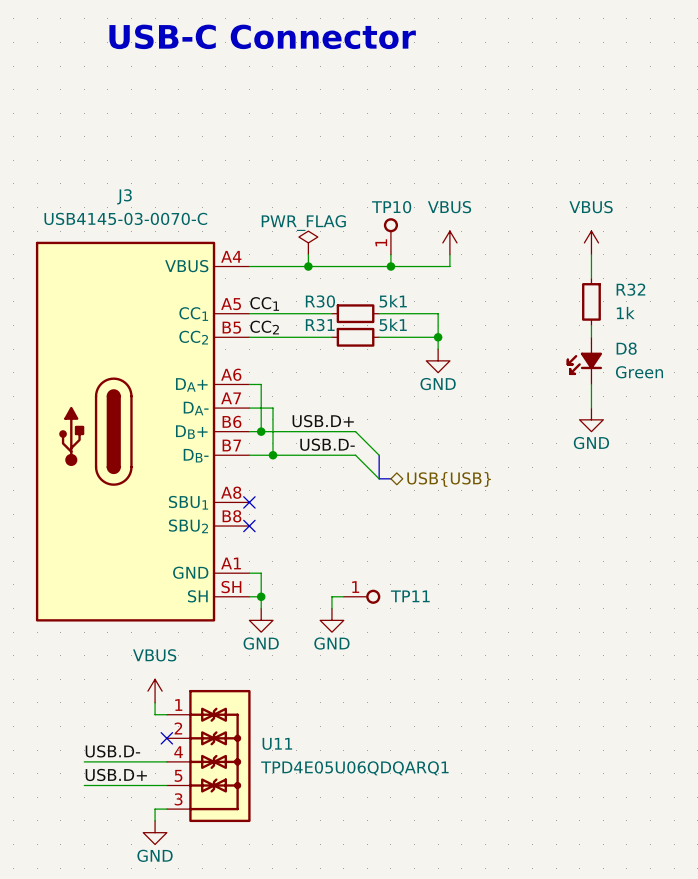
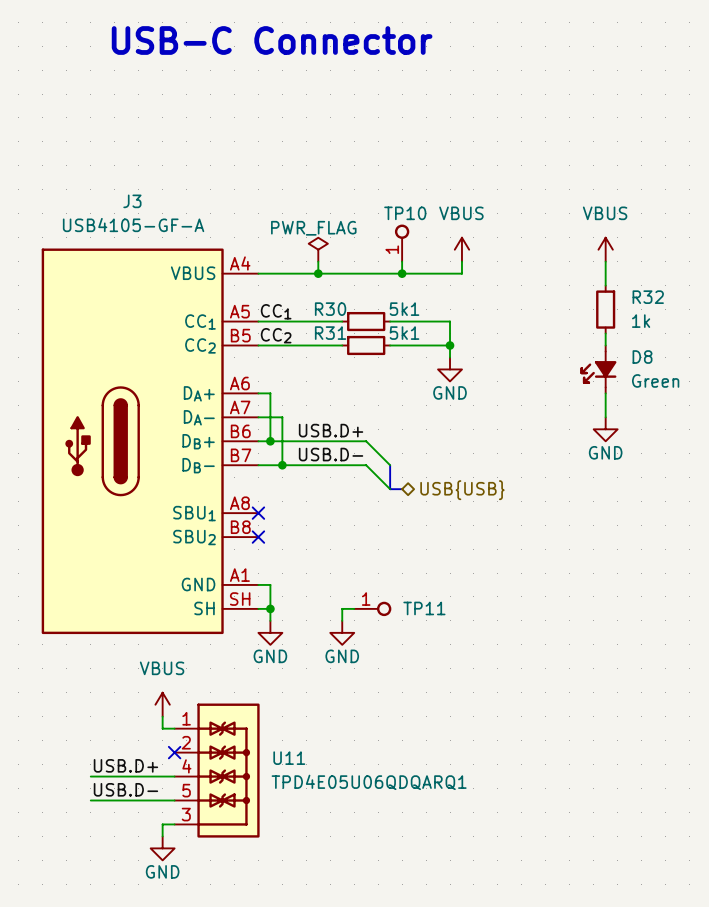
J3 text: USB4145-03-0070-C (125, 218) -> USB4105-GF-A (133, 225)
label: USB.D- (112, 751) -> USB.D+ (125, 765)
label: USB.D+ (116, 774) -> USB.D- (125, 789)

